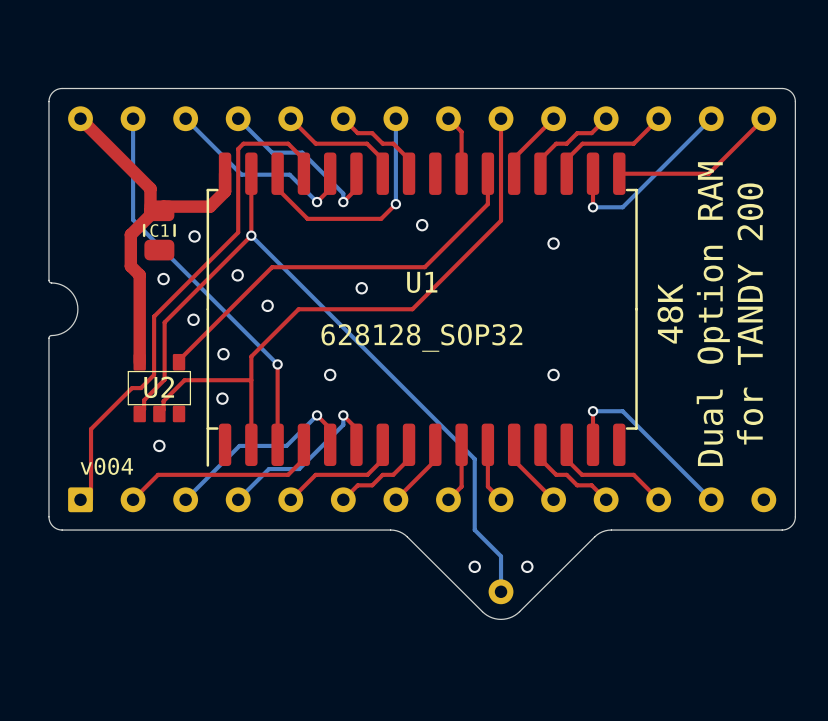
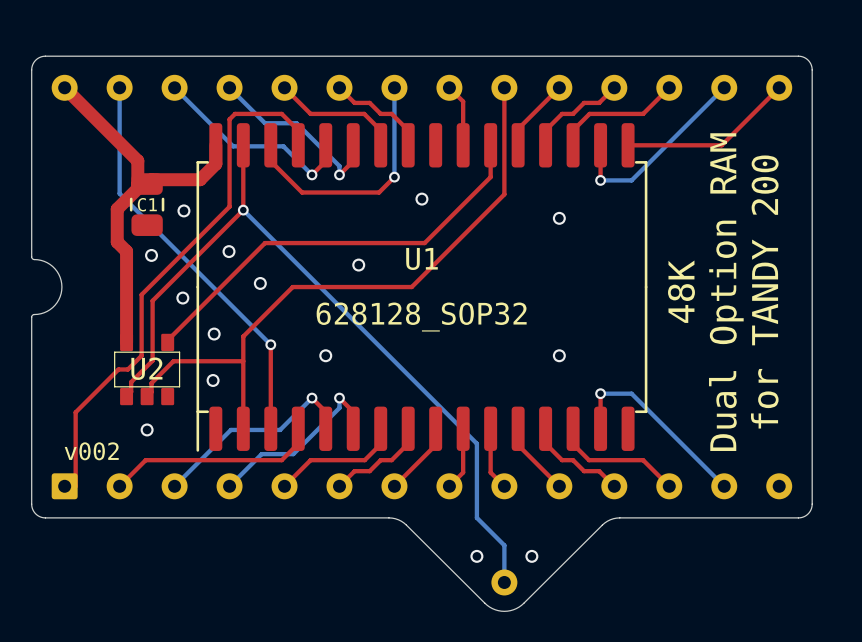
text: v004 (106, 466) -> v002 (91, 451)

